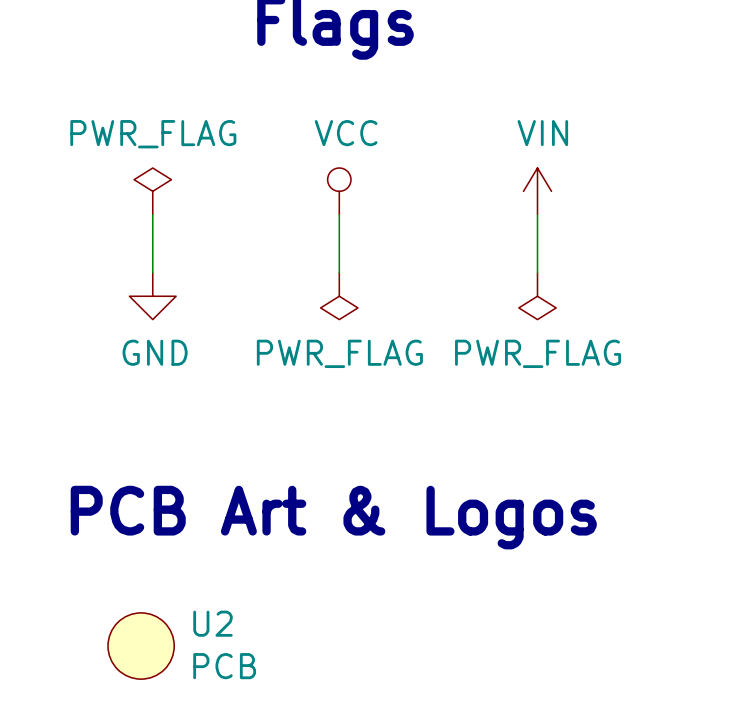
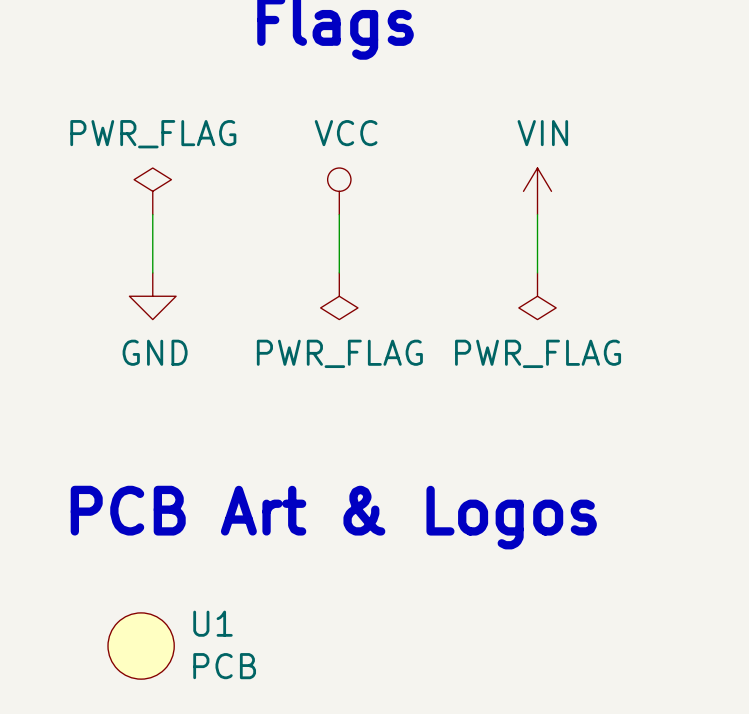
U2 name: U2 (212, 623) -> U1 (212, 623)

